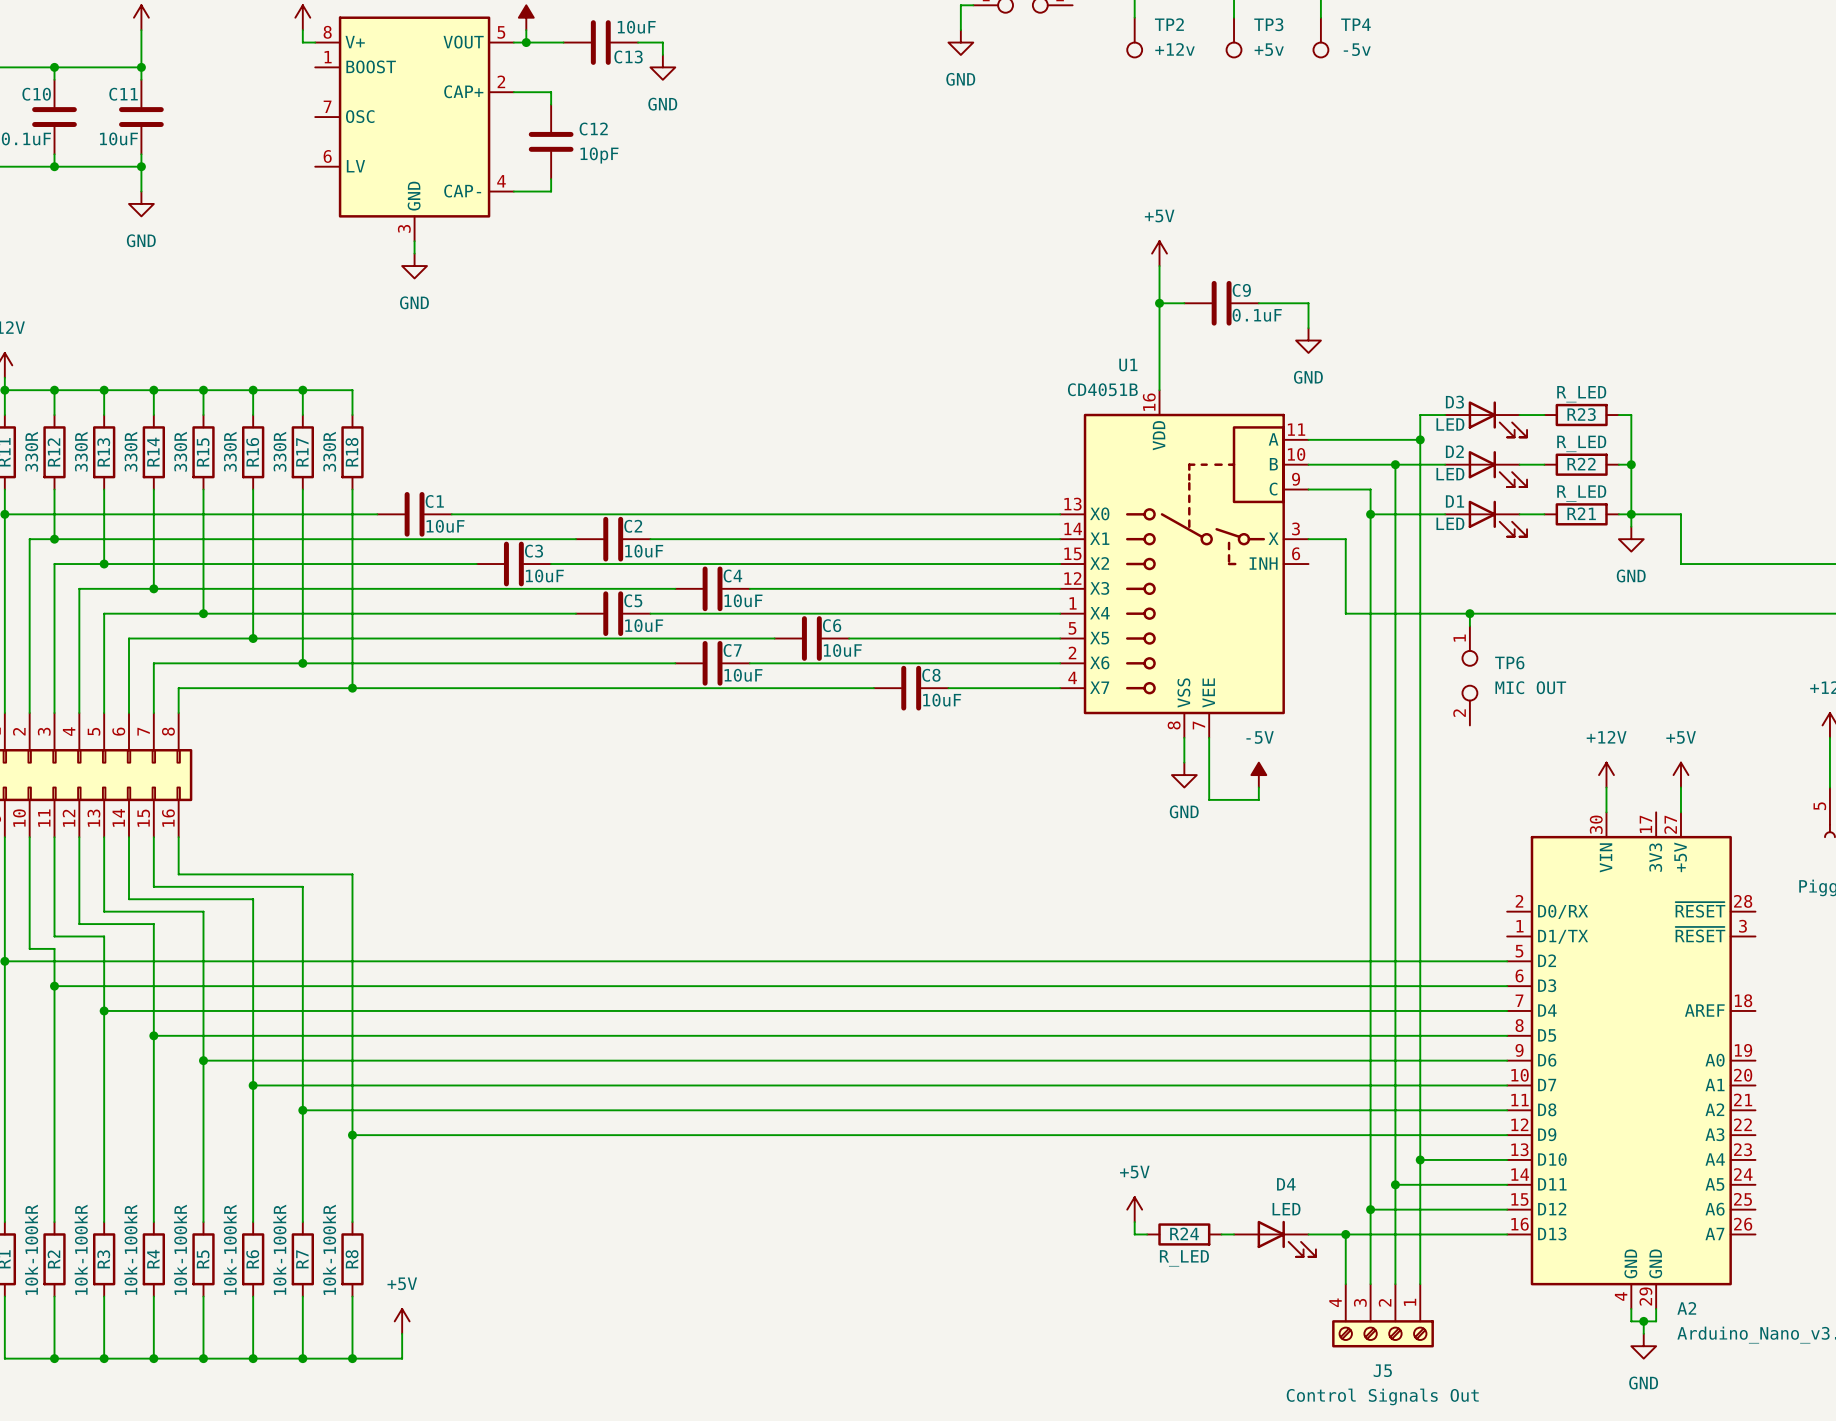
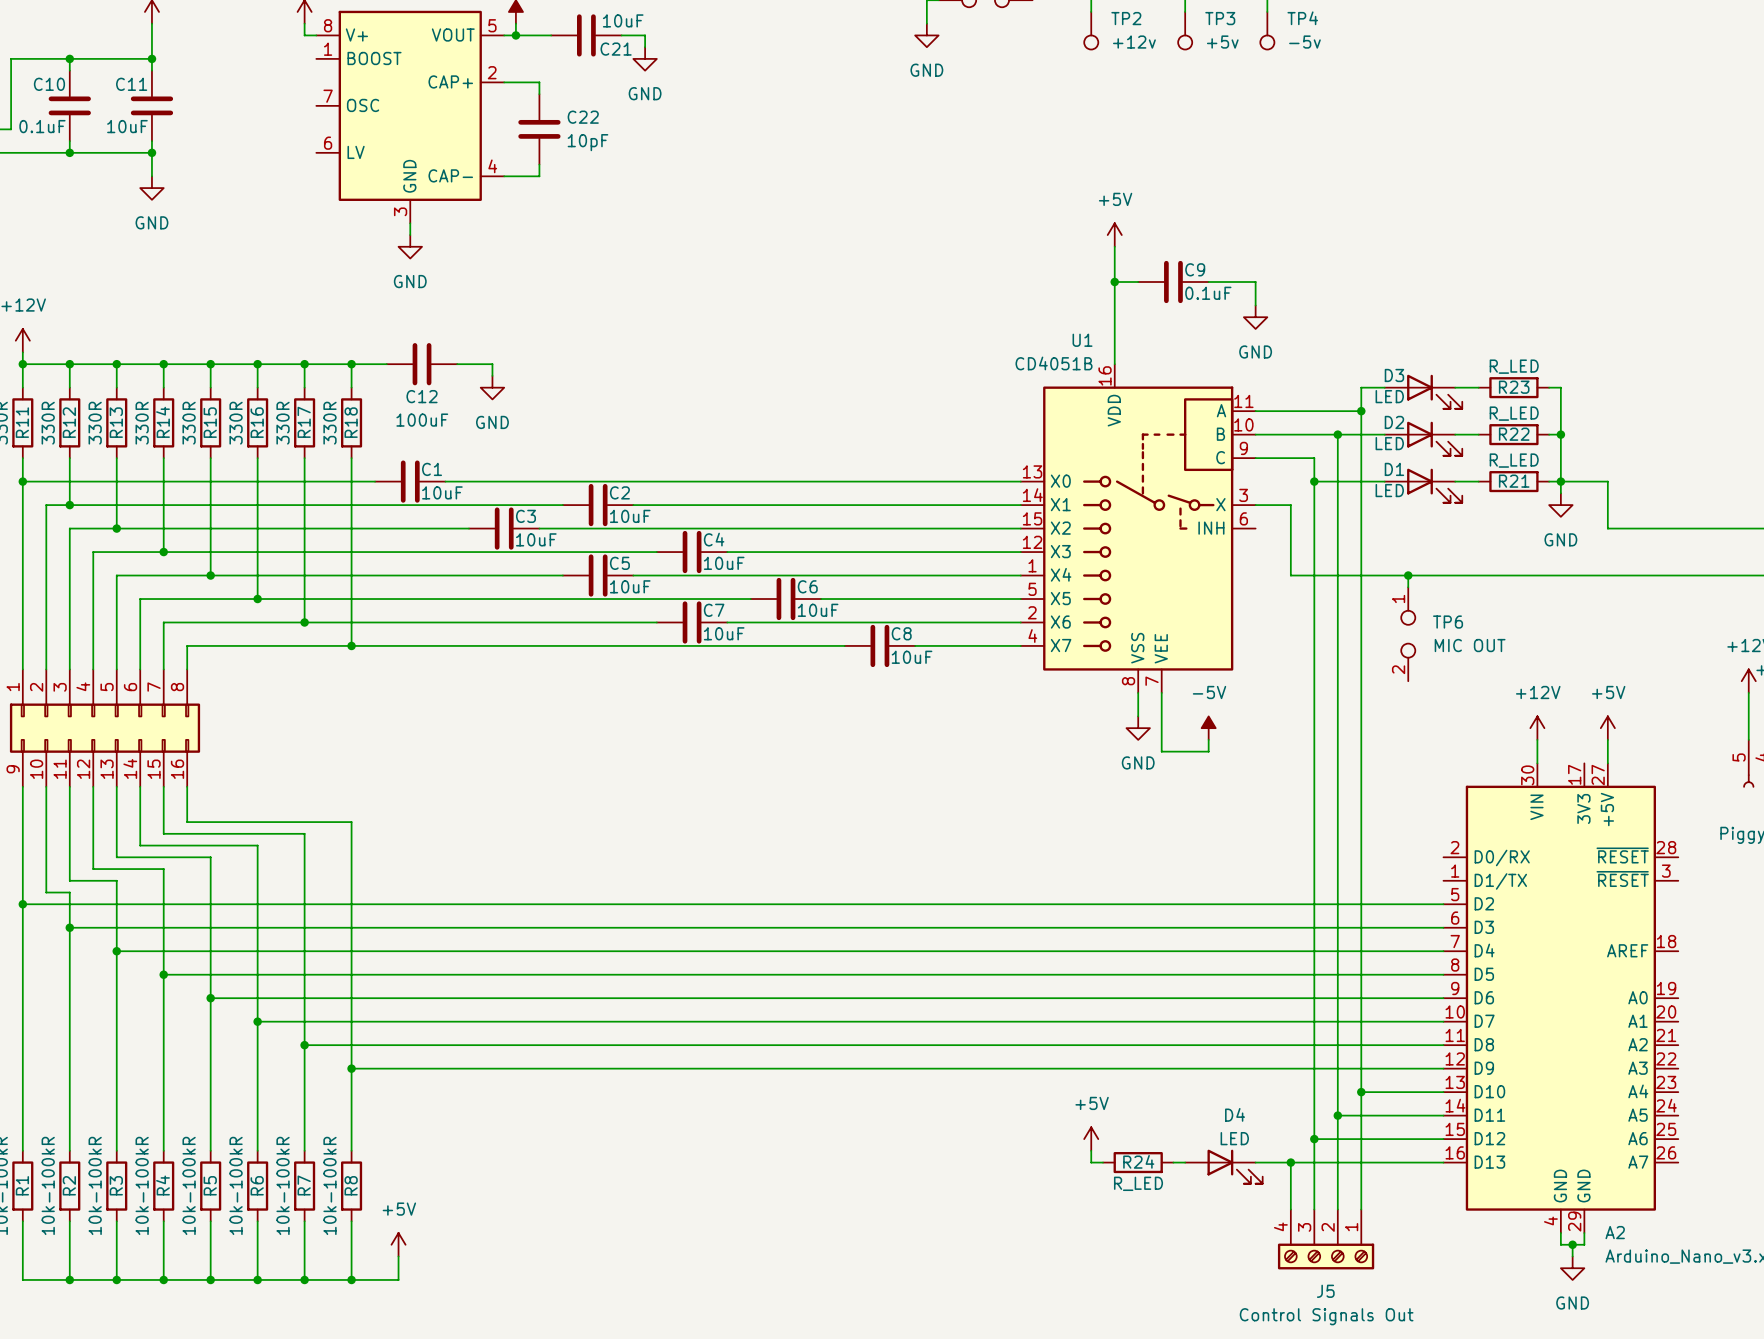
C13 name: C13 (628, 56) -> C21 (616, 49)
C12 name: C12 (593, 129) -> C22 (583, 117)
wire: none -> (351, 364) (386, 364)
junction: none -> (351, 364)
C12: none -> 100uF (422, 364)
wire: none -> (457, 364) (492, 364) (492, 375)
power symbol: none -> GND (492, 387)

